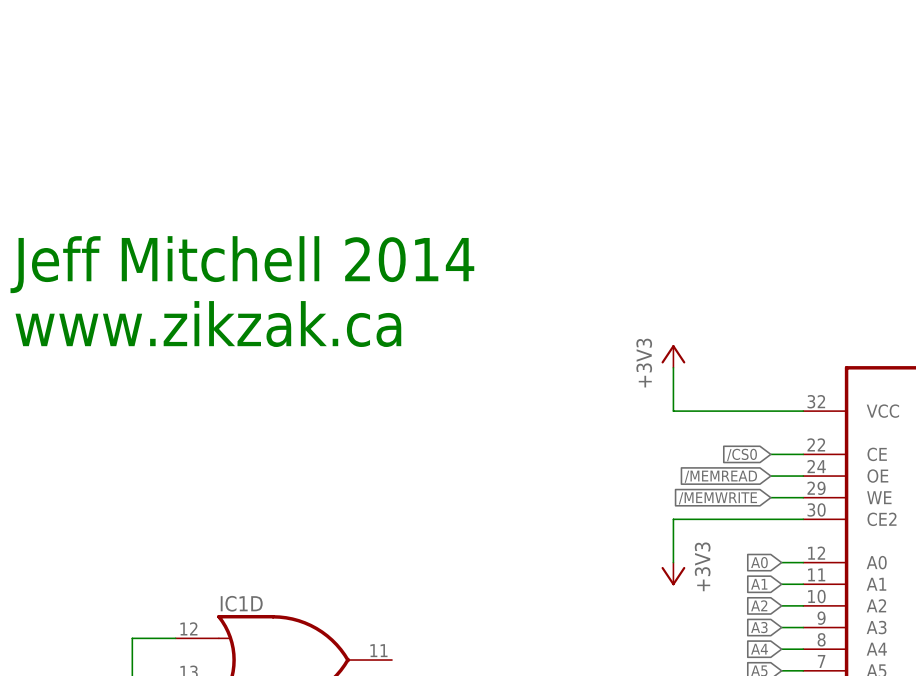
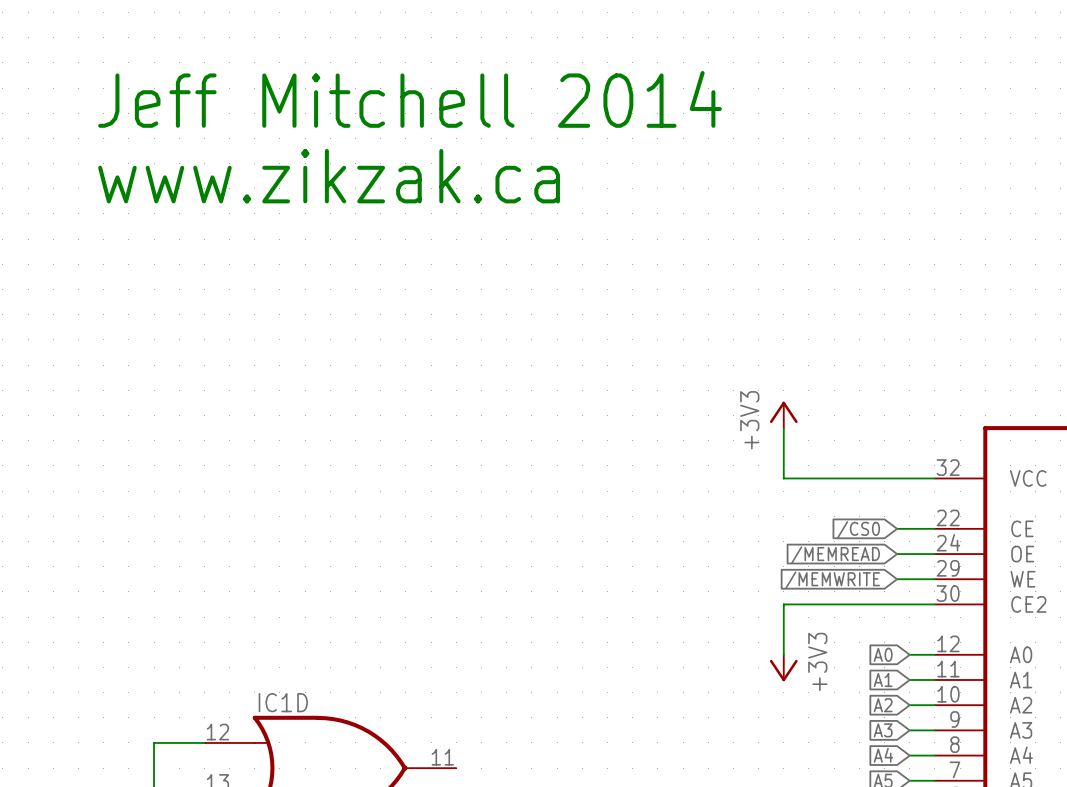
text position: Jeff Mitchell 2014 (242, 264) -> Jeff Mitchell 2014 (410, 99)
text position: www.zikzak.ca (208, 324) -> www.zikzak.ca (329, 176)

